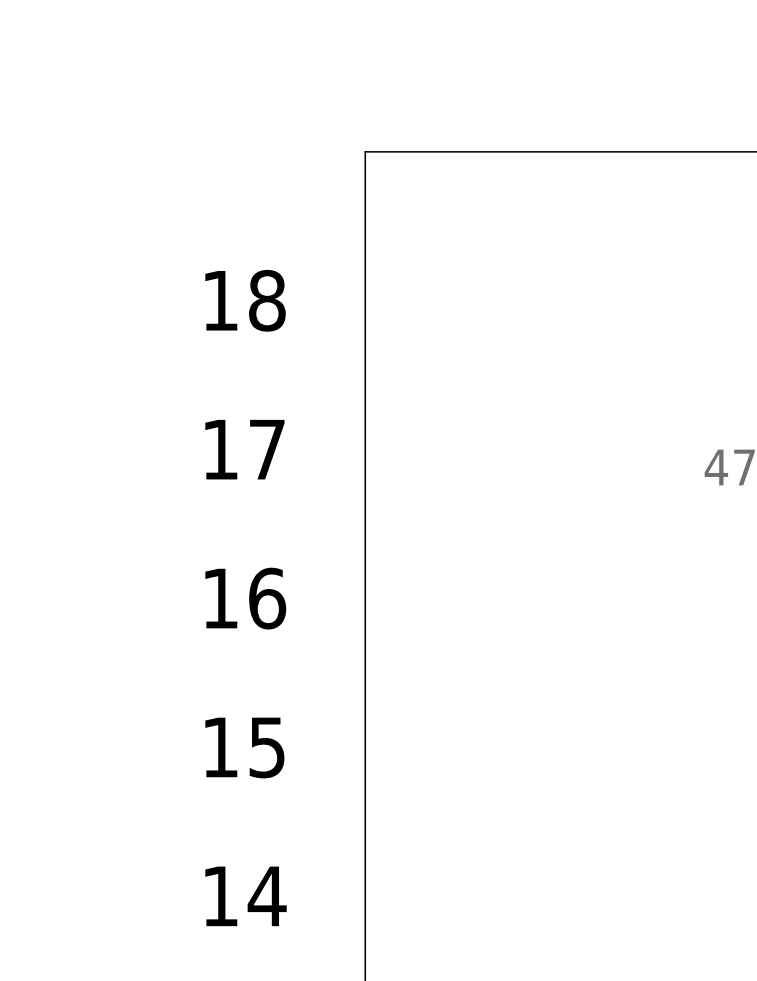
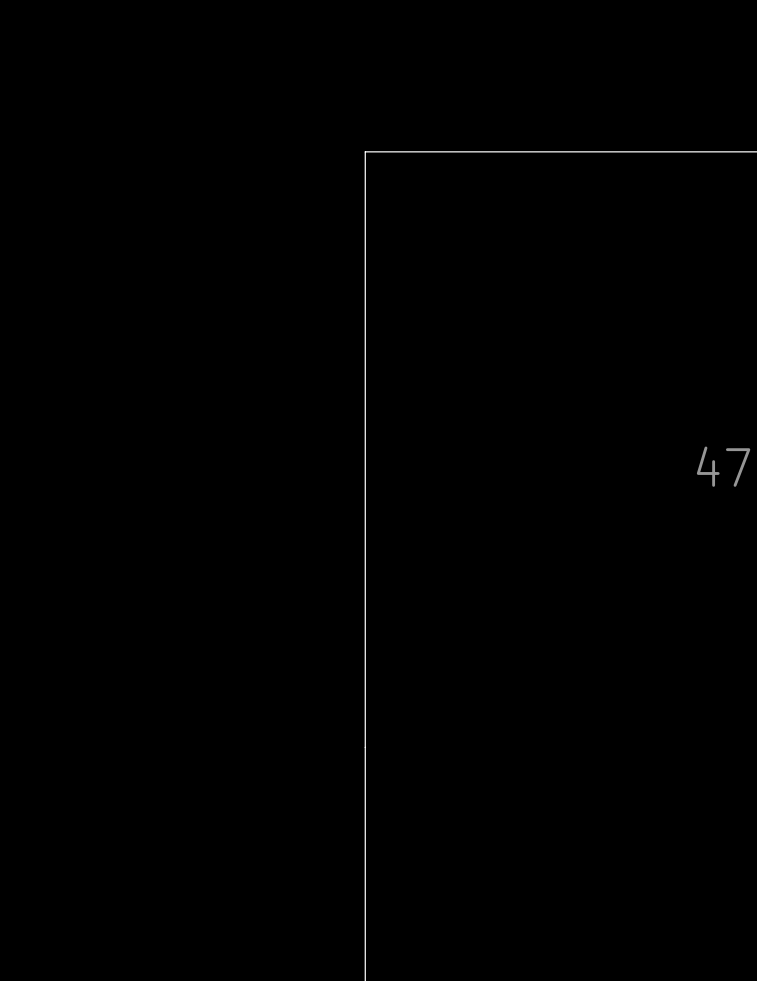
text: 18 (245, 300) -> none
text: 17 (244, 449) -> none
text: 16 (245, 598) -> none
text: 15 (244, 748) -> none
text: 14 (246, 896) -> none

